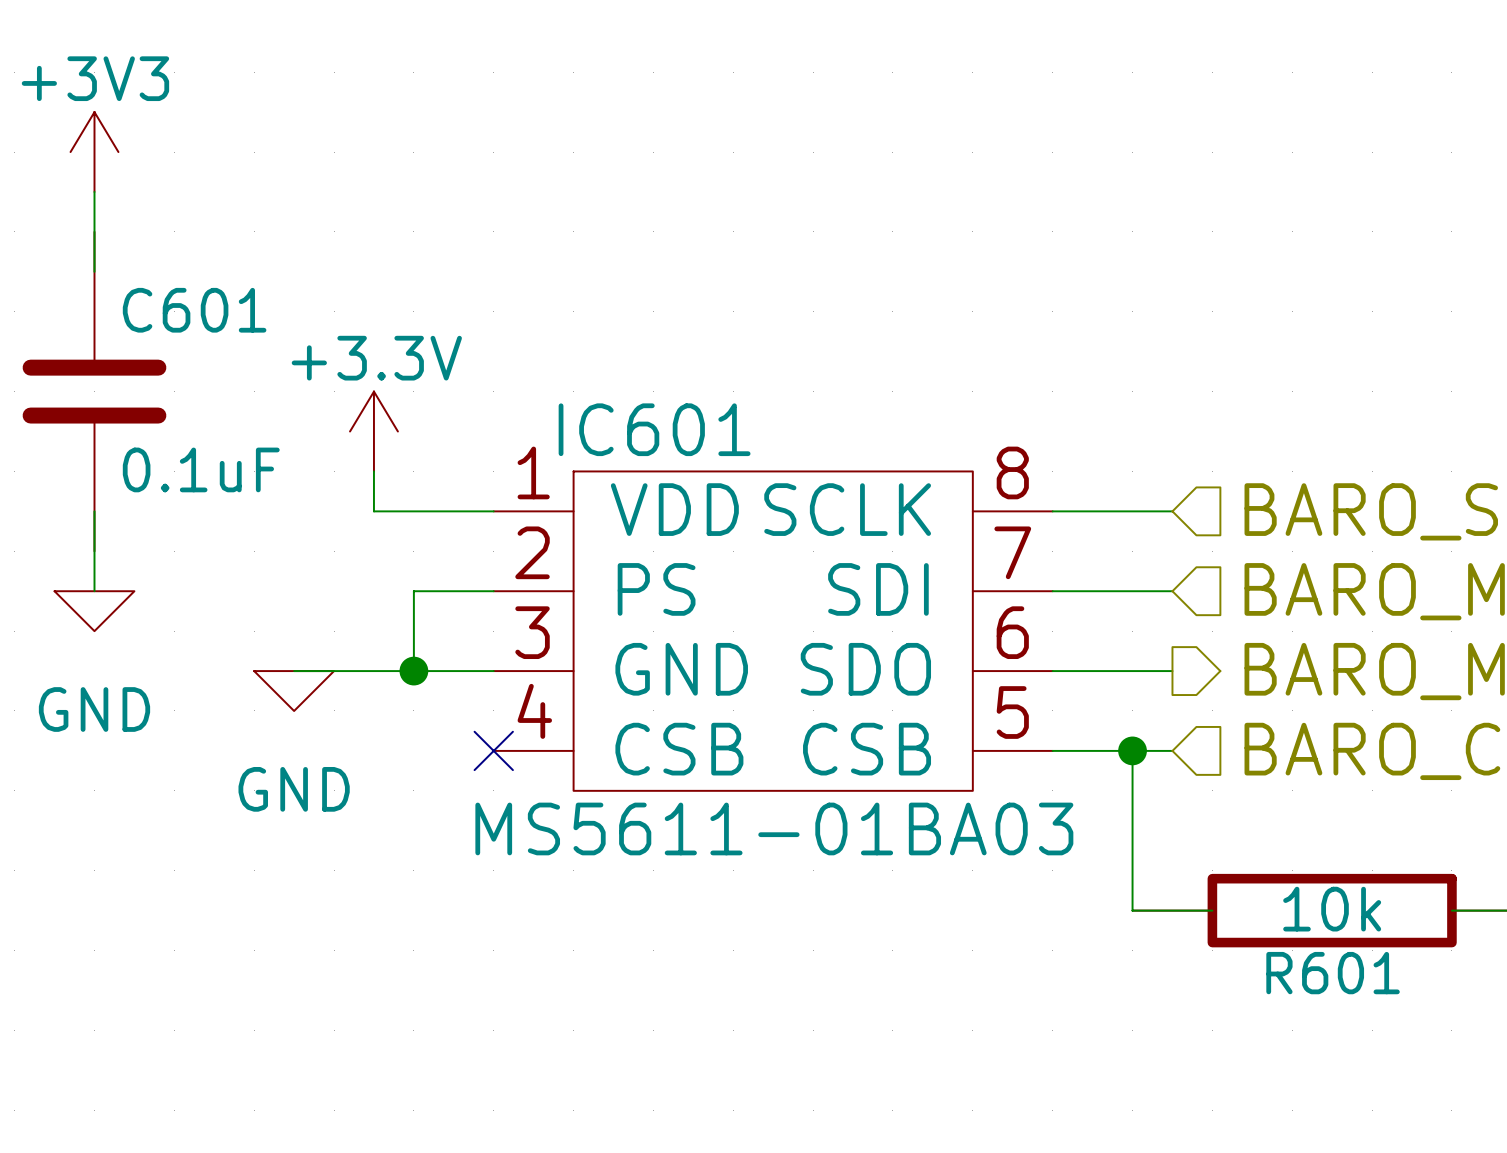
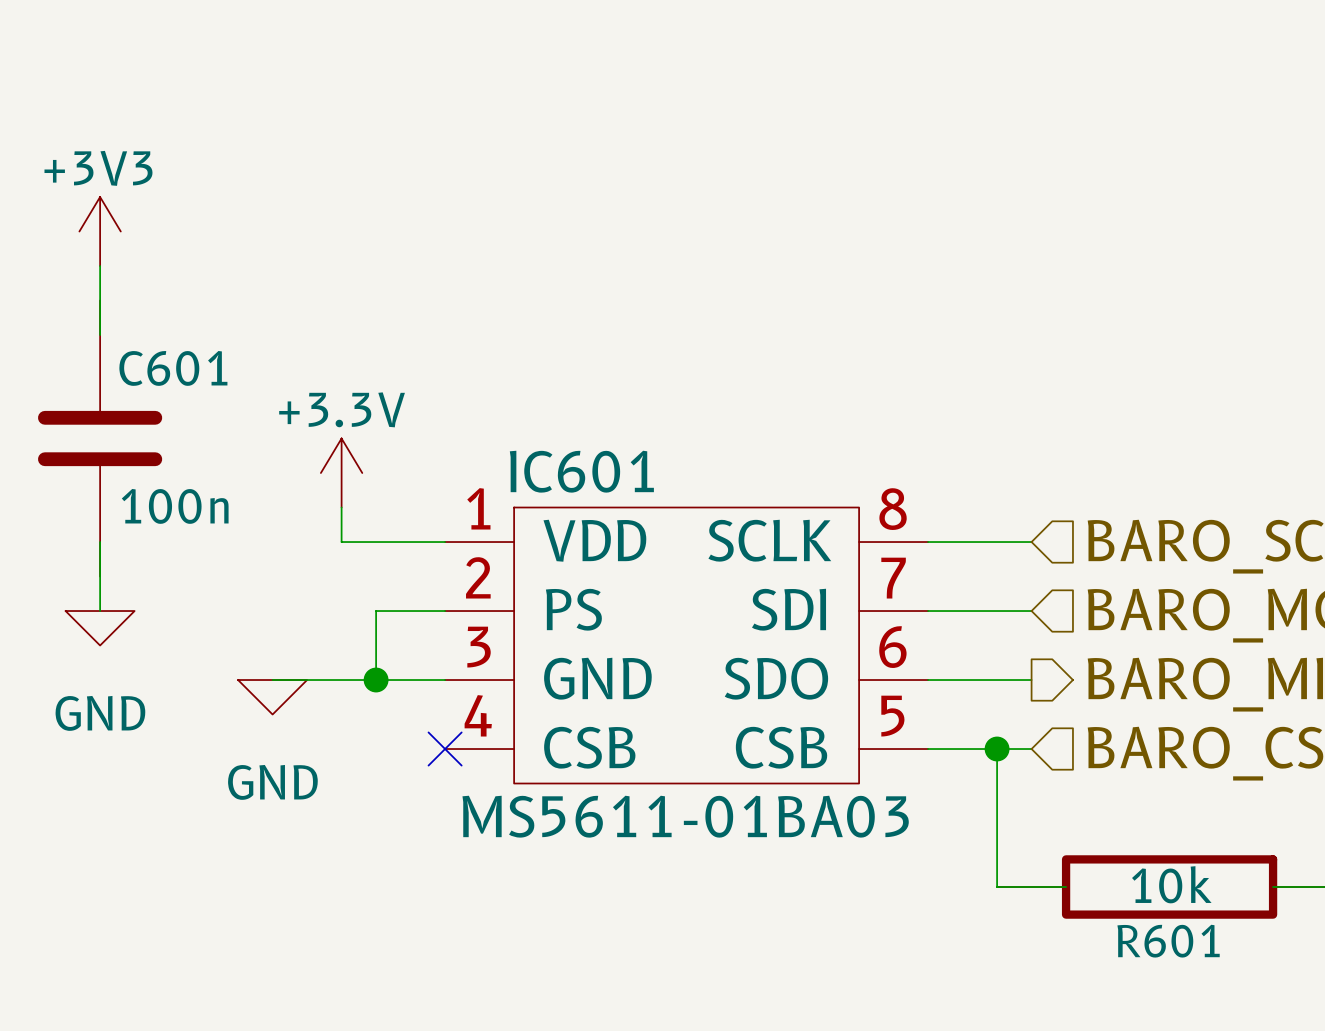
C601 value: 0.1uF (201, 469) -> 100n (175, 506)

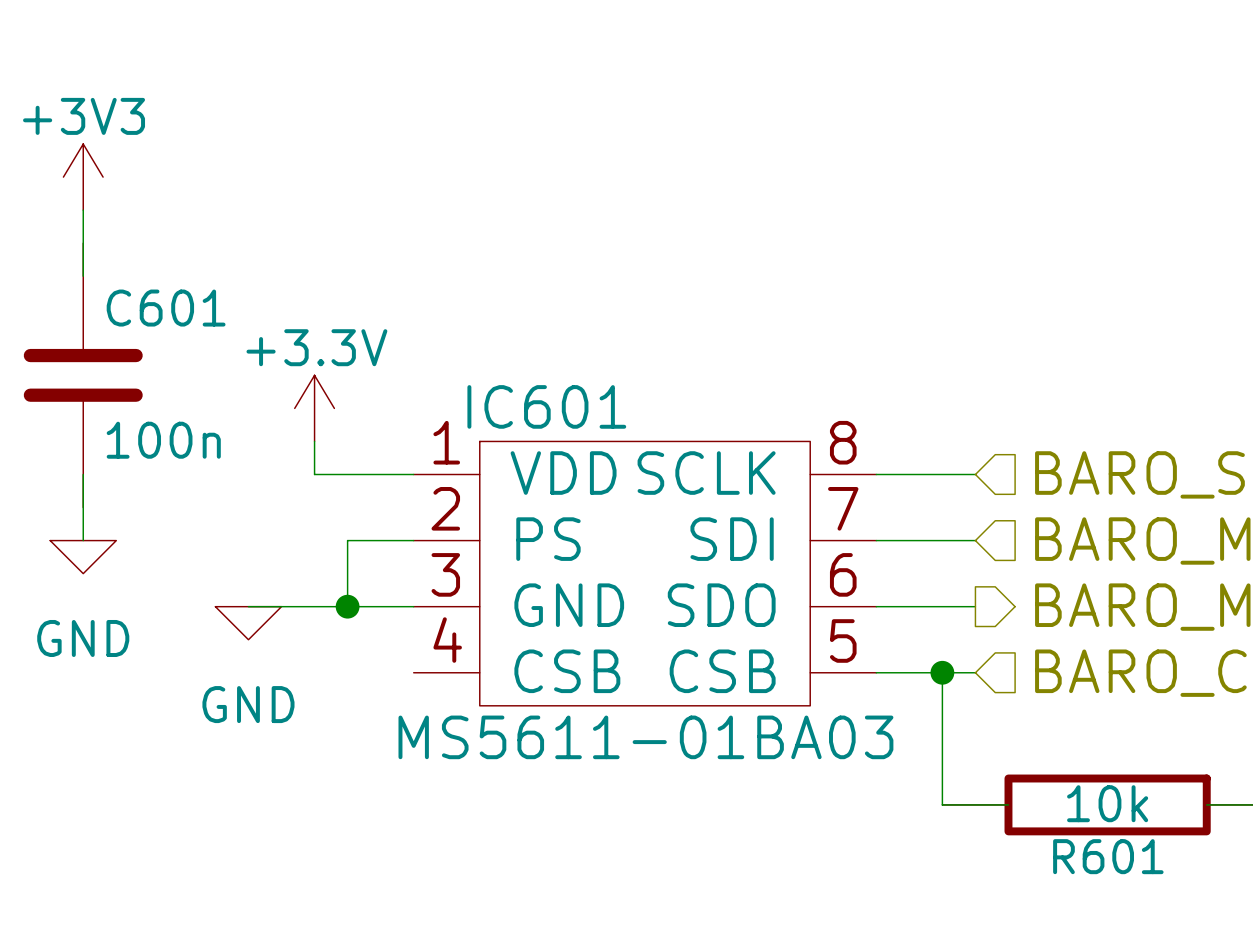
no-connect mark: (445, 749) -> none

